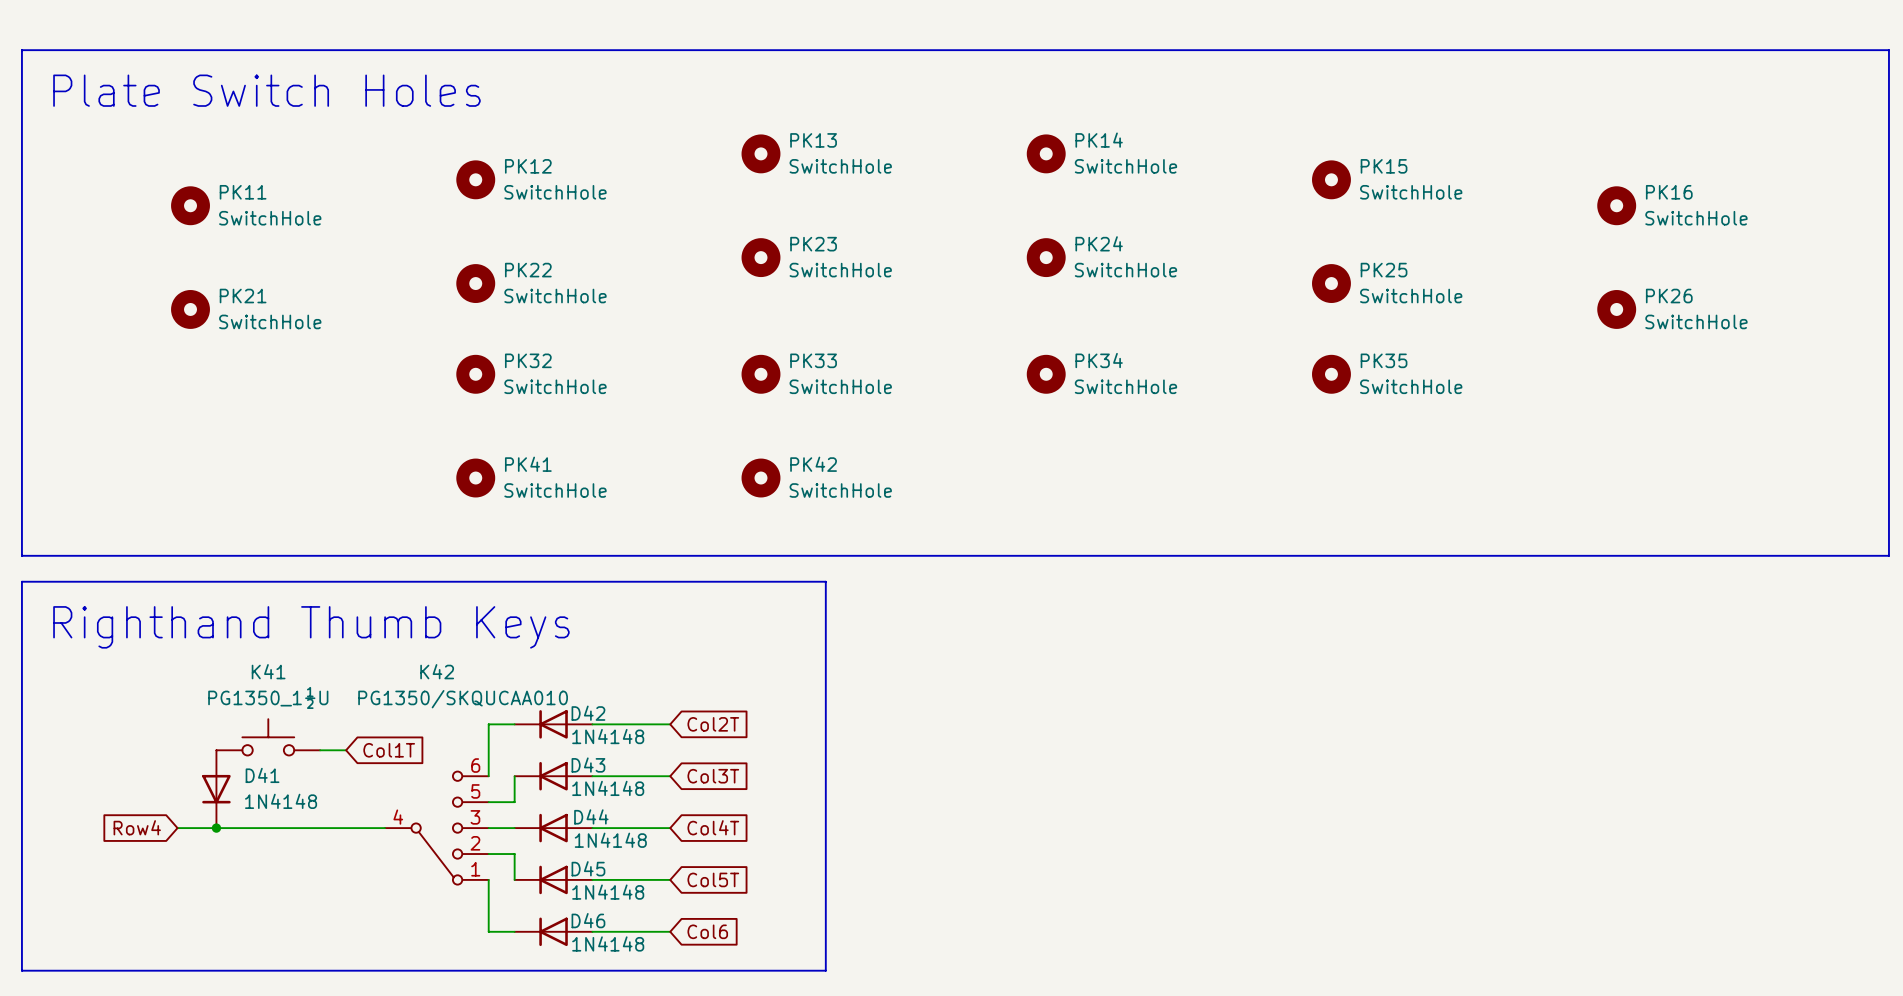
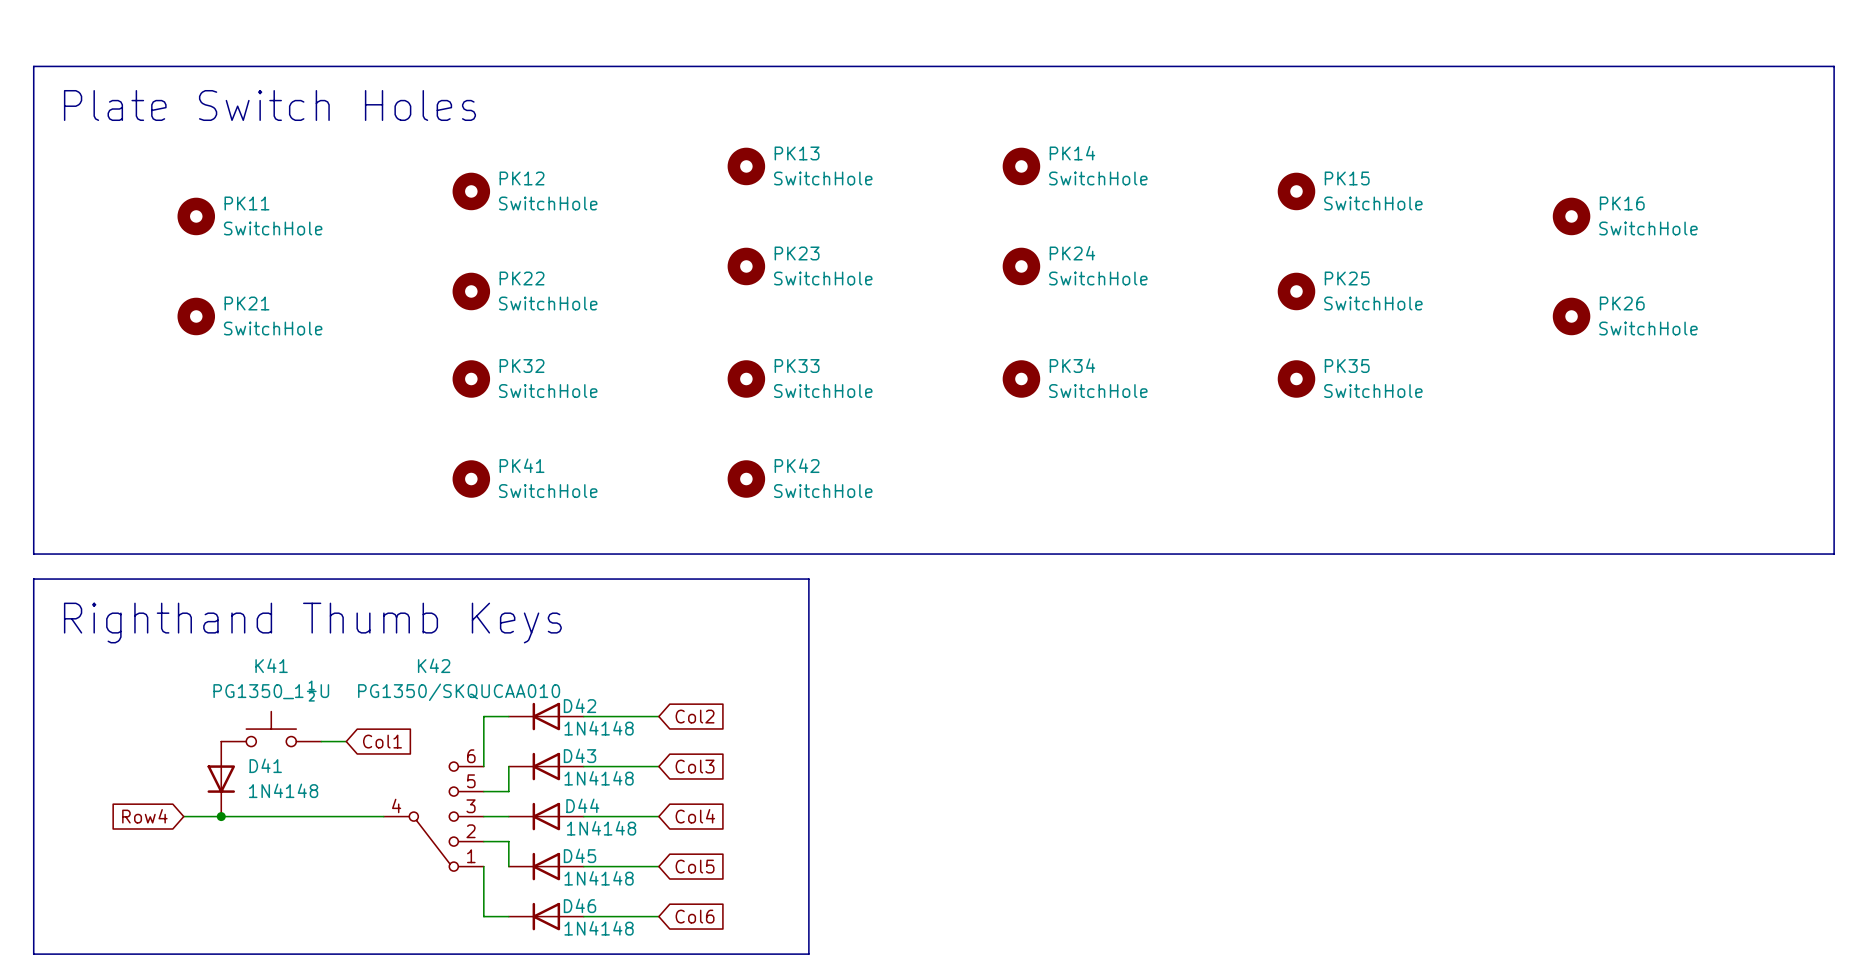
global label: Col2T (713, 724) -> Col2 (695, 716)
global label: Col1T (389, 750) -> Col1 (382, 741)
global label: Col3T (713, 776) -> Col3 (695, 766)
global label: Col4T (713, 827) -> Col4 (695, 816)
global label: Col5T (713, 879) -> Col5 (695, 866)

